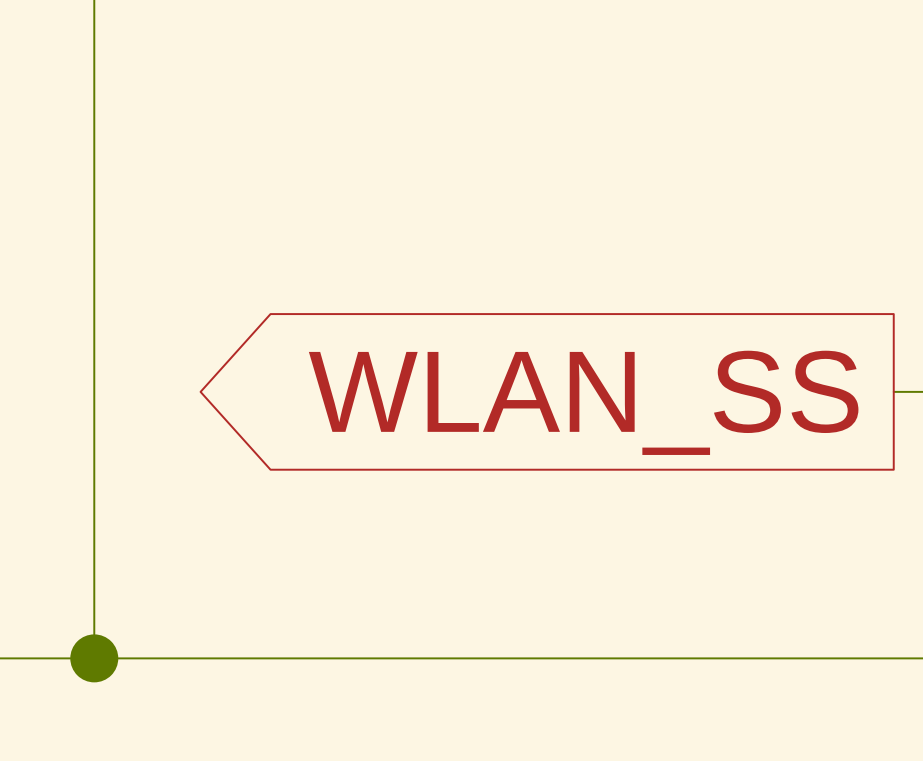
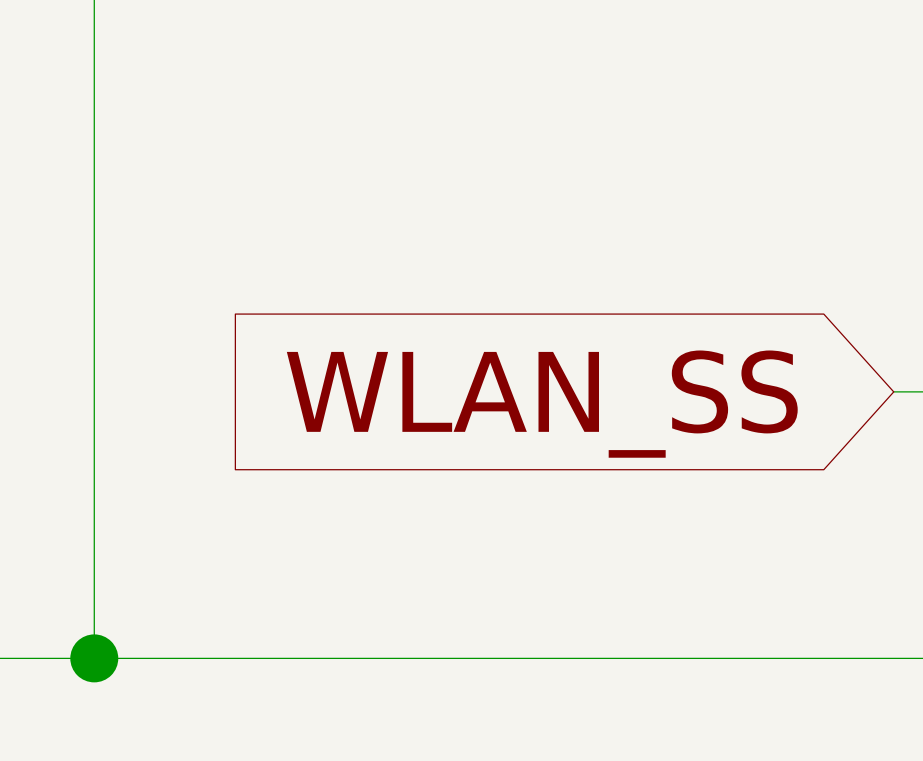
global label shape: output (583, 402) -> input (542, 404)

